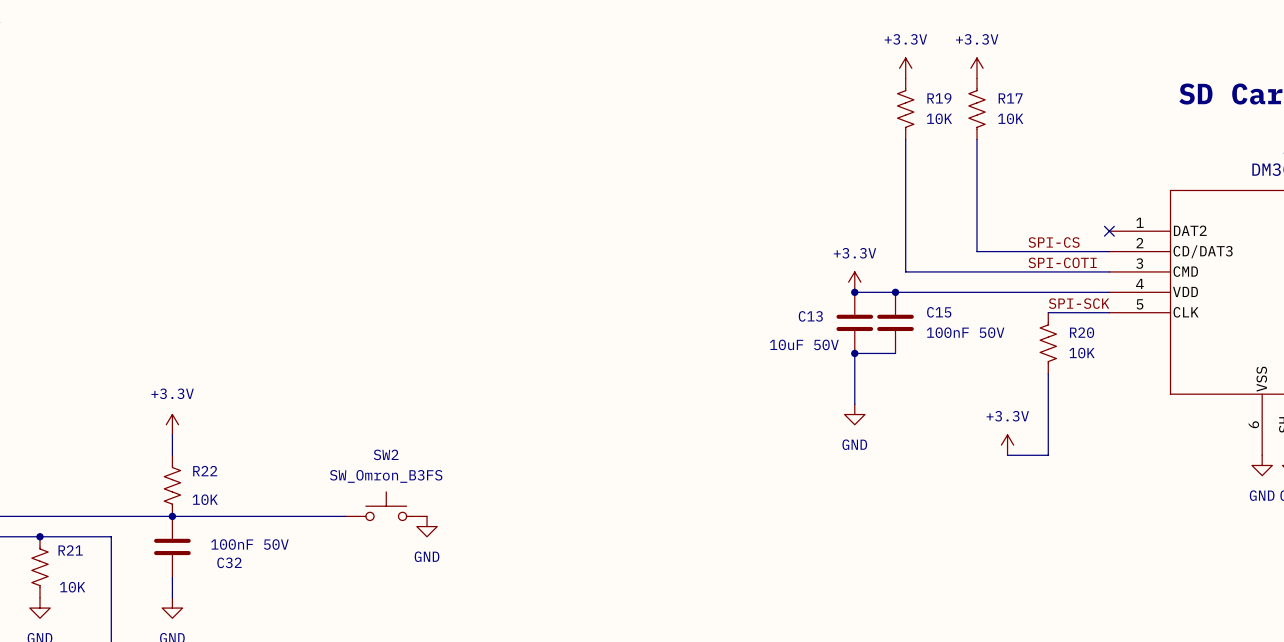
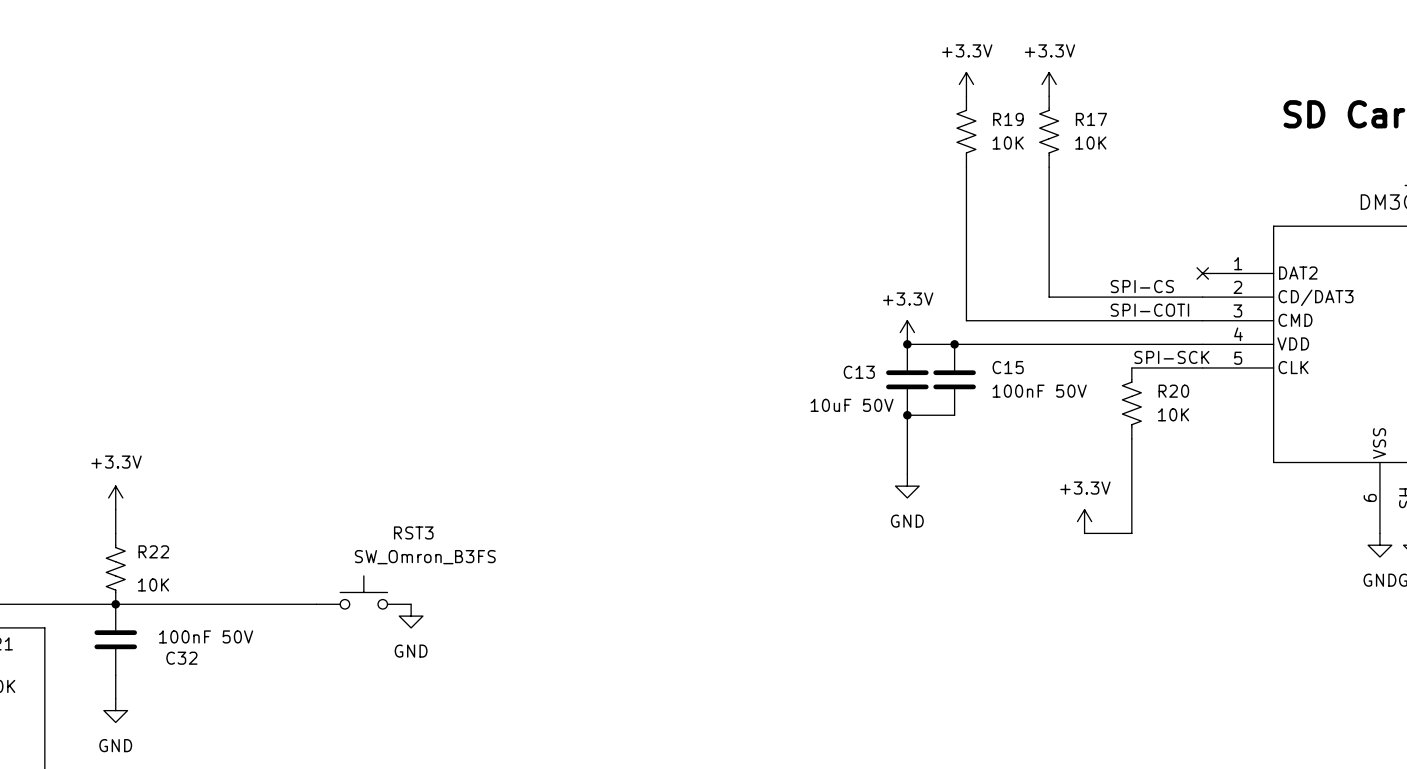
SW2 name: SW2 (386, 454) -> RST3 (413, 532)
SW2 value position: SW_Omron_B3FS (386, 476) -> SW_Omron_B3FS (425, 557)

